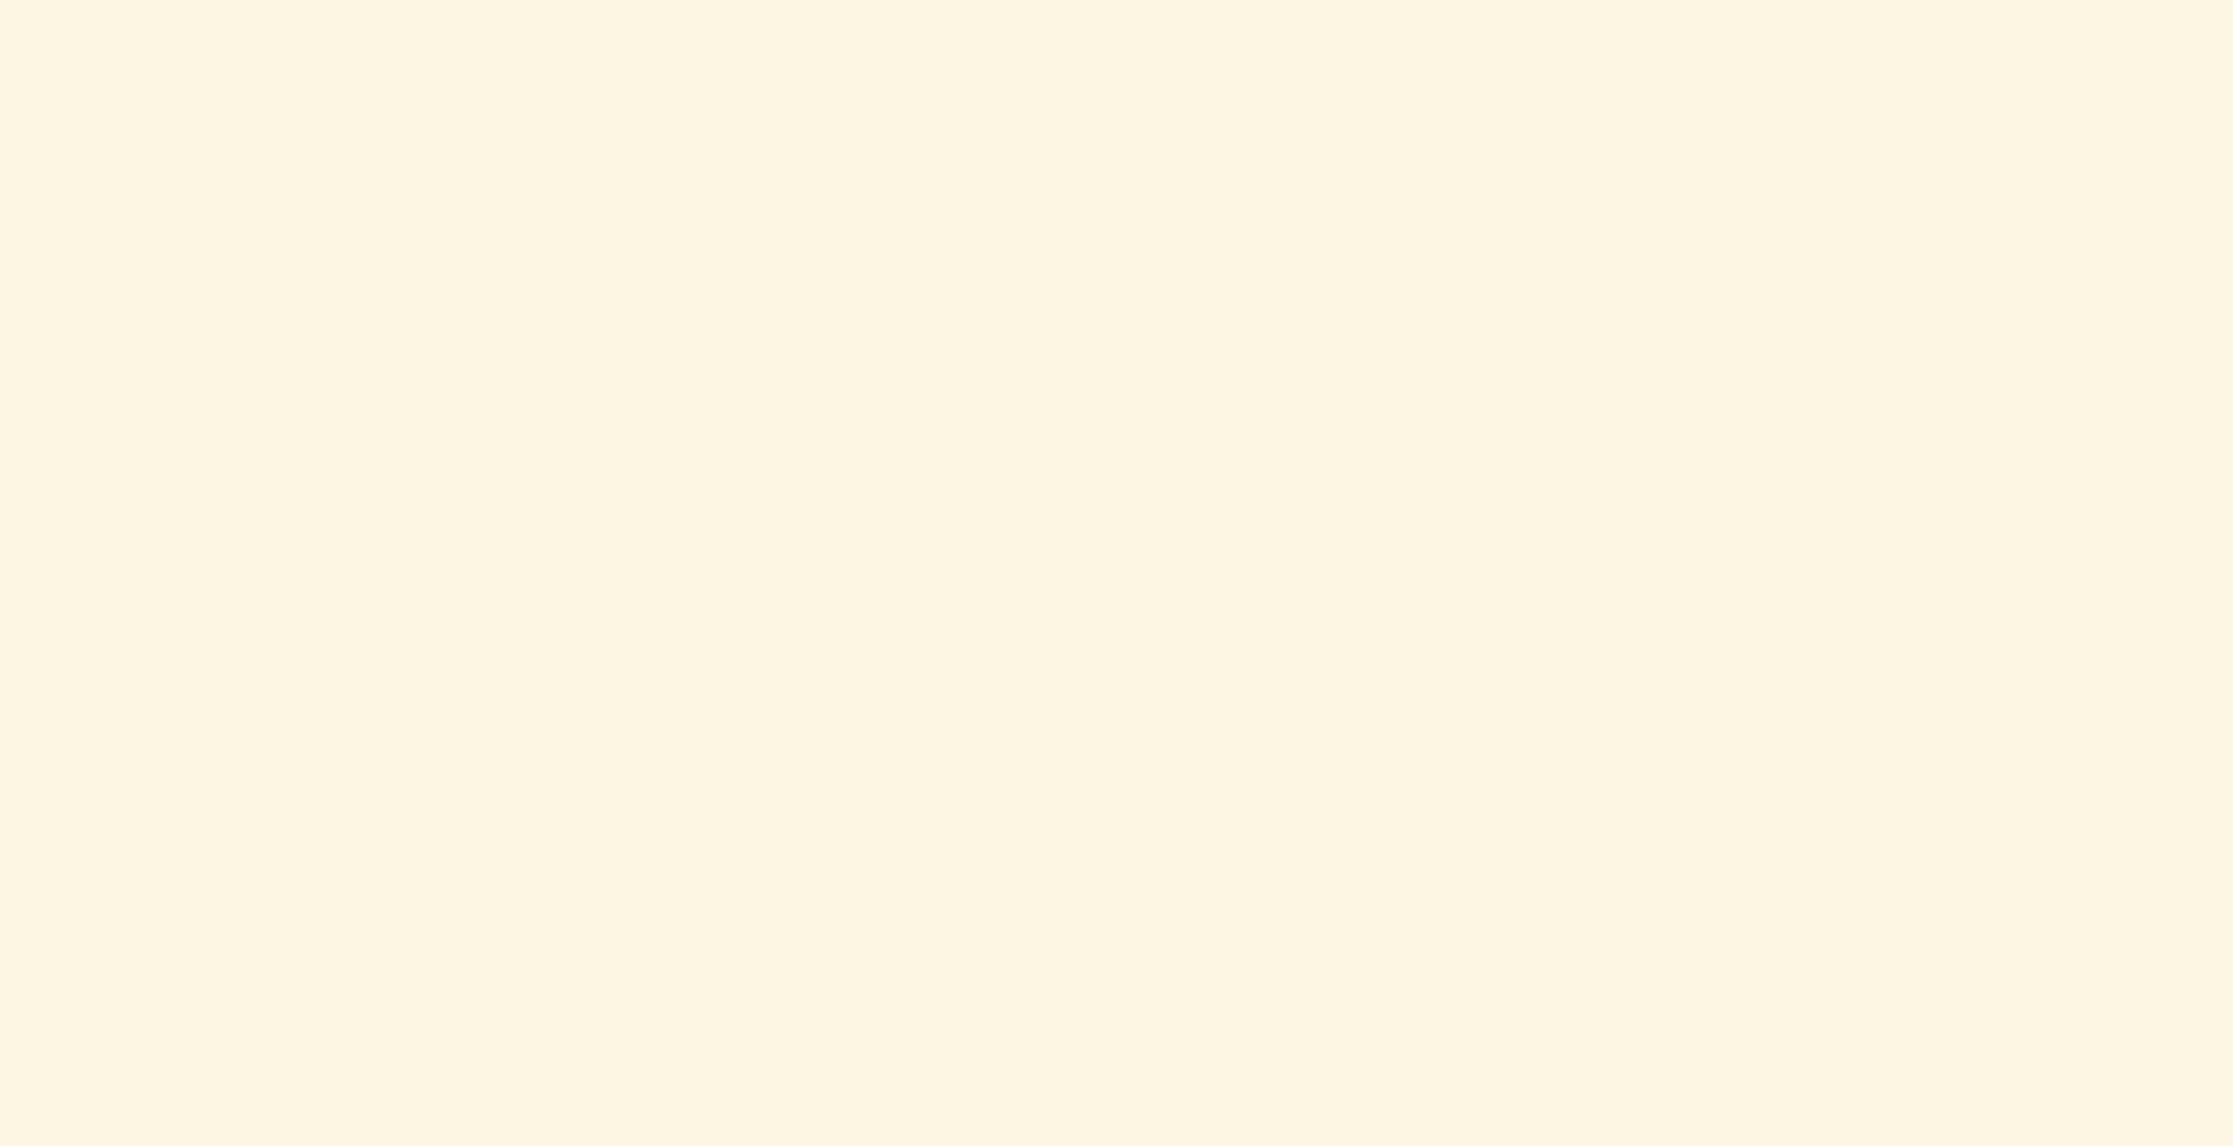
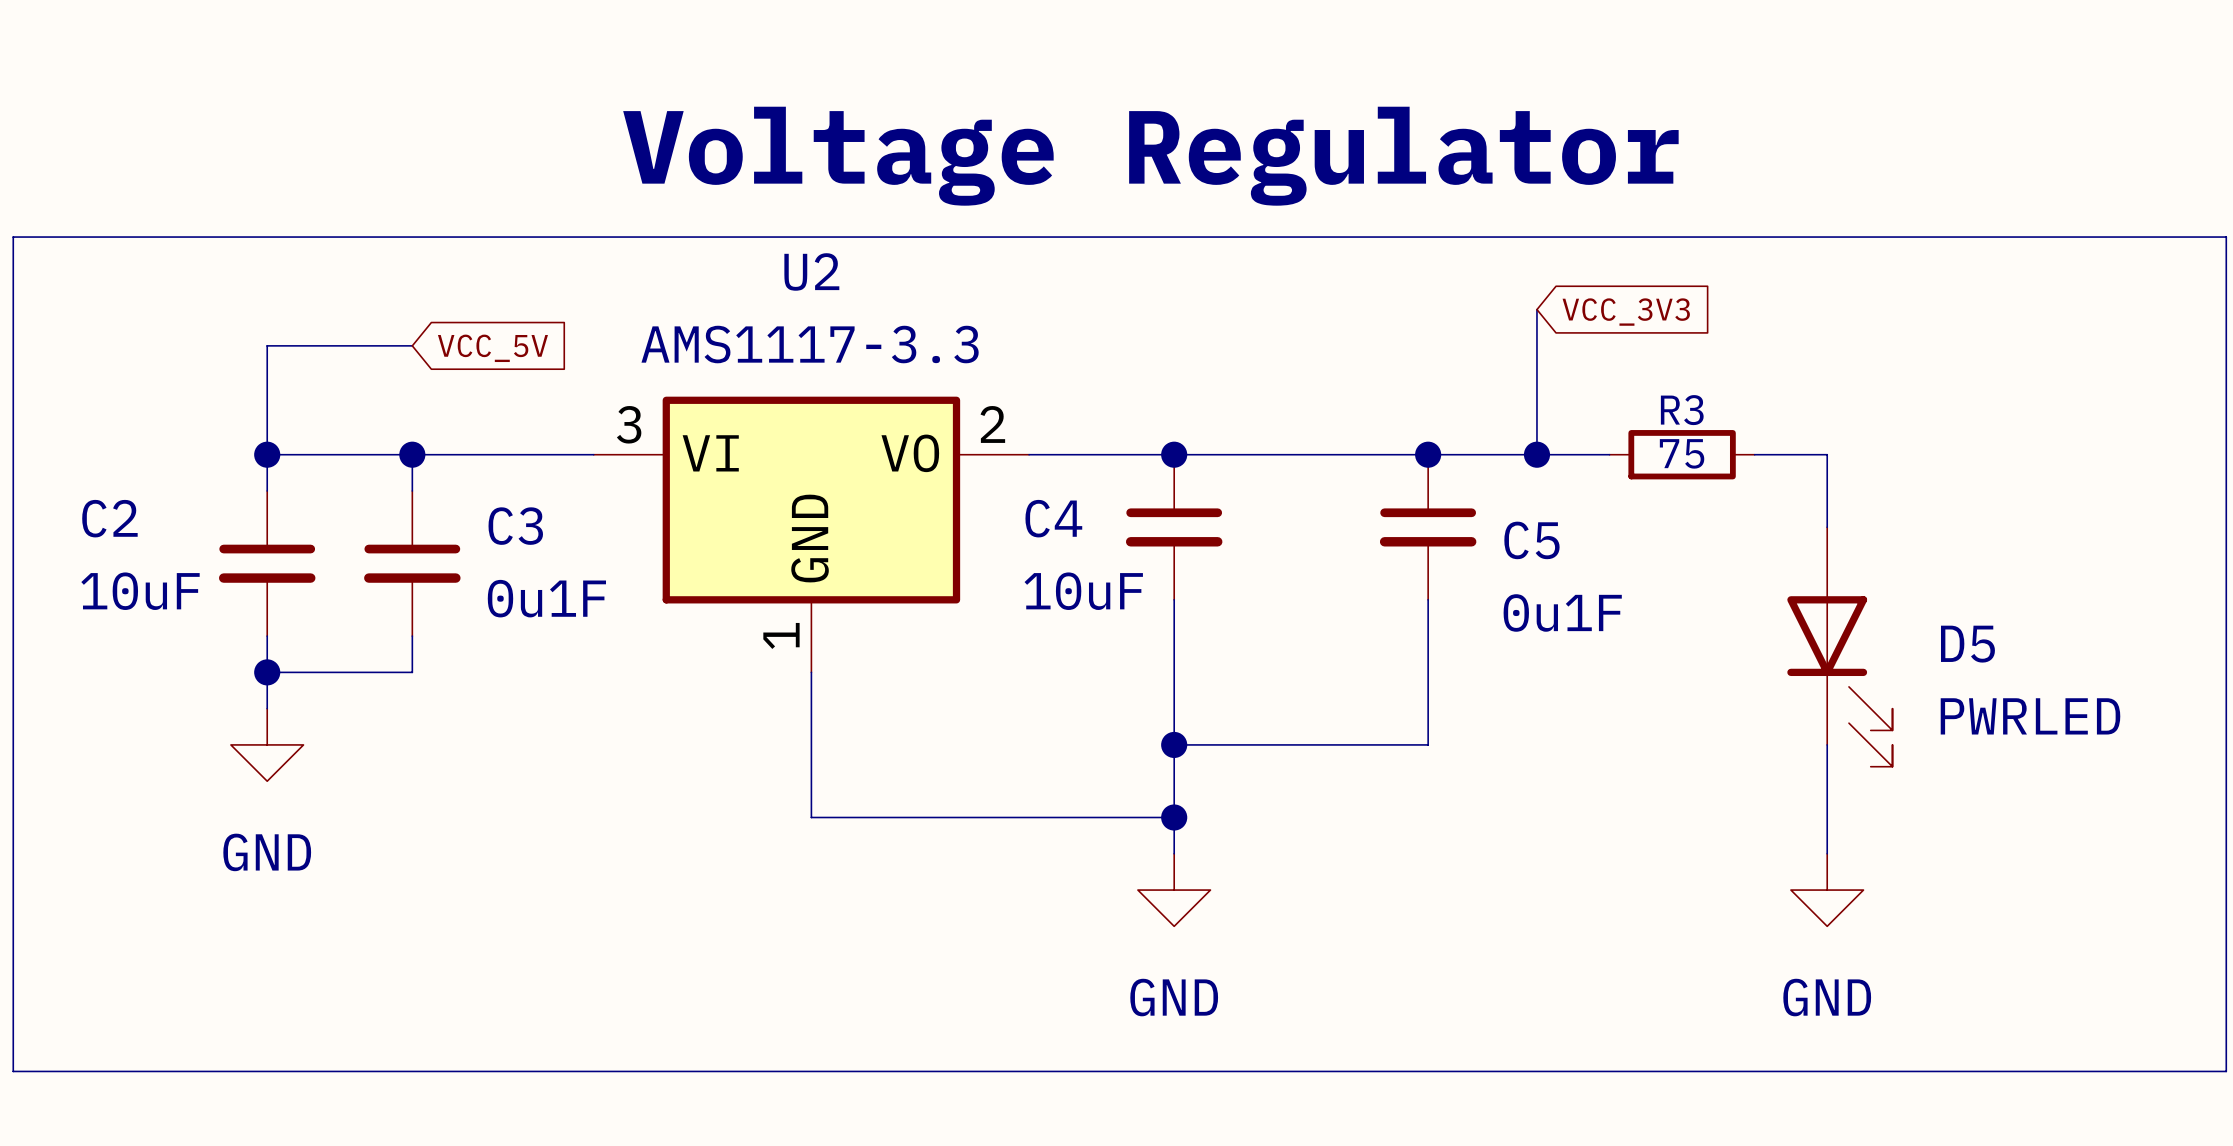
text: none -> Voltage Regulator (1150, 156)
line: none -> (13, 237) (2226, 237) (2226, 1071) (13, 1071) (13, 237)
wire: none -> (1536, 309) (1536, 454)
global label: none -> VCC_3V3 (1626, 312)
wire: none -> (412, 345) (267, 345) (267, 490)
global label: none -> VCC_5V (492, 348)
wire: none -> (267, 454) (593, 454)
junction: none -> (267, 454)
wire: none -> (412, 454) (412, 490)
junction: none -> (412, 454)
wire: none -> (1029, 454) (1609, 454)
junction: none -> (1174, 454)
junction: none -> (1428, 454)
junction: none -> (1536, 454)
R3: none -> 75 (1682, 454)
wire: none -> (1754, 454) (1827, 454) (1827, 527)
C4: none -> 10uF (1174, 527)
C5: none -> 0u1F (1428, 527)
U2: none -> AMS1117-3.3 (811, 534)
C2: none -> 10uF (267, 563)
C3: none -> 0u1F (412, 563)
wire: none -> (1174, 599) (1174, 853)
wire: none -> (1428, 599) (1428, 744) (1174, 744)
wire: none -> (267, 636) (267, 708)
wire: none -> (412, 636) (412, 672) (267, 672)
D5: none -> PWRLED (1839, 646)
junction: none -> (267, 672)
wire: none -> (811, 672) (811, 817) (1174, 817)
power symbol: none -> GND (267, 744)
junction: none -> (1174, 744)
wire: none -> (1827, 744) (1827, 853)
junction: none -> (1174, 817)
power symbol: none -> GND (1174, 890)
power symbol: none -> GND (1827, 890)

